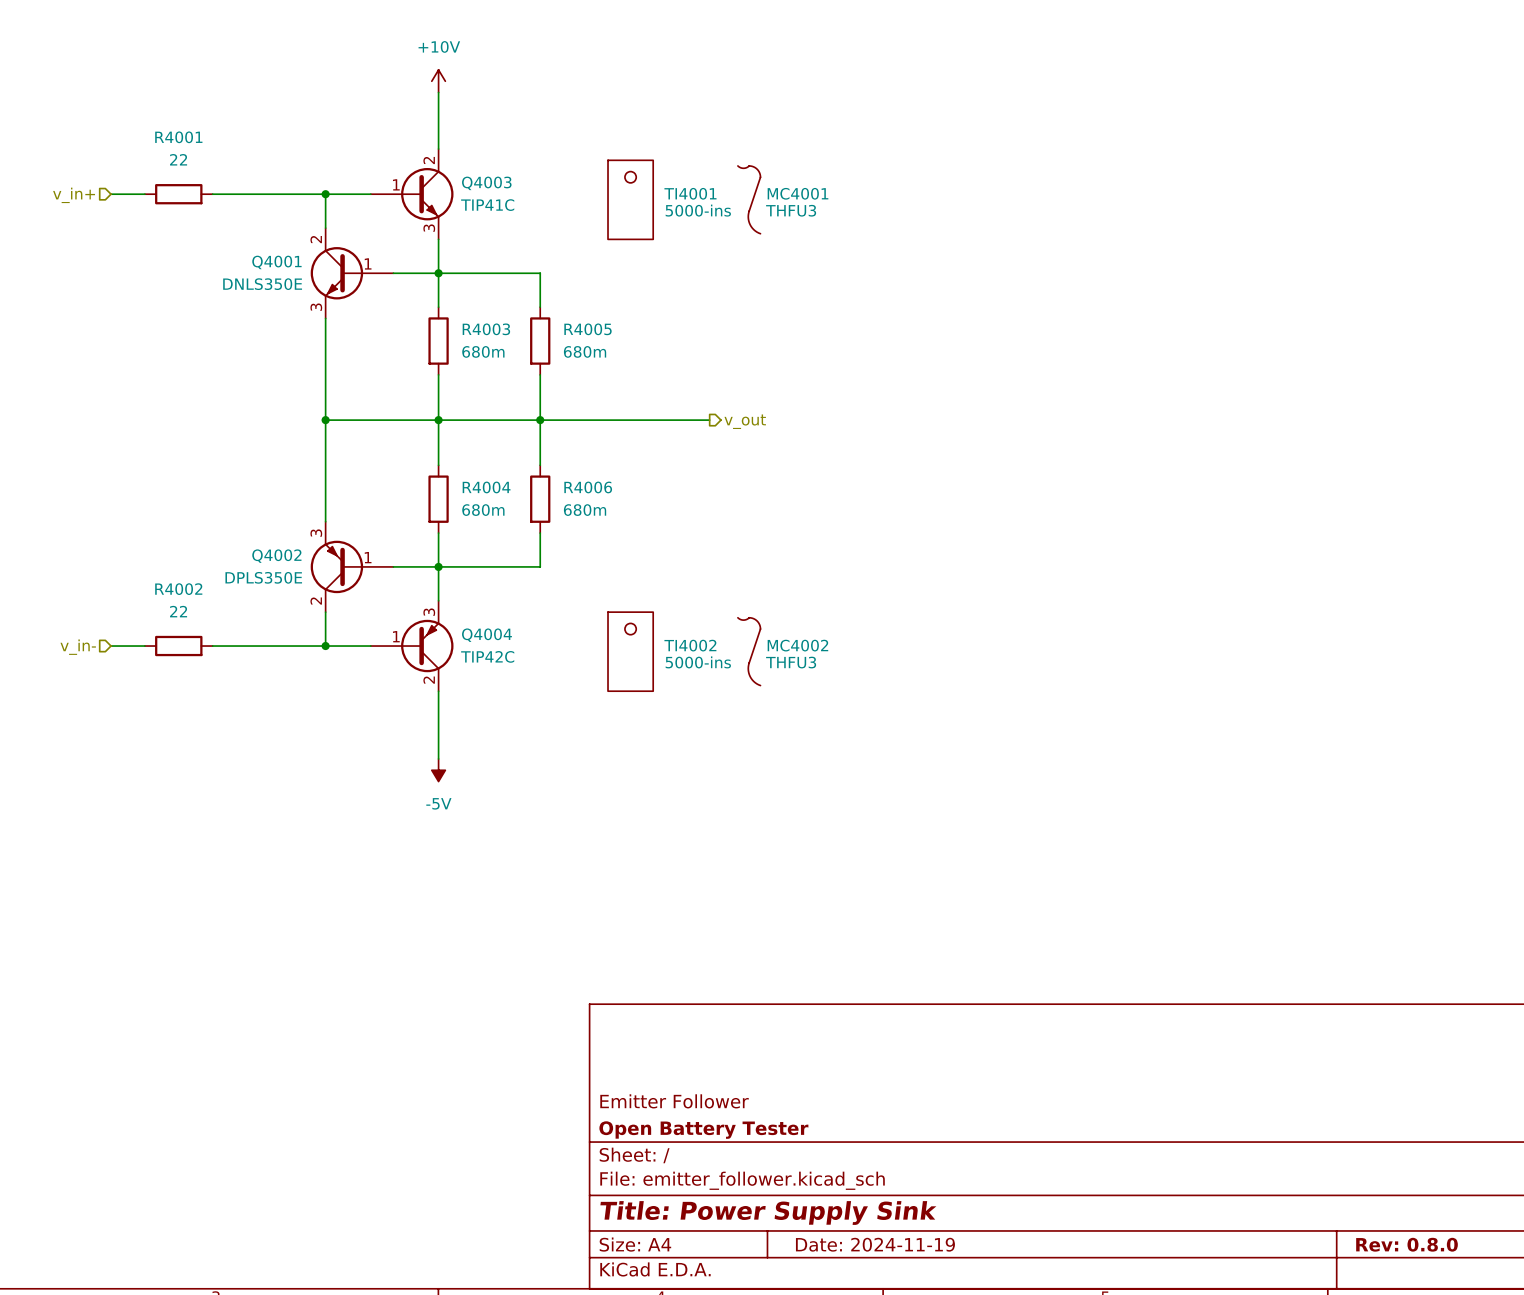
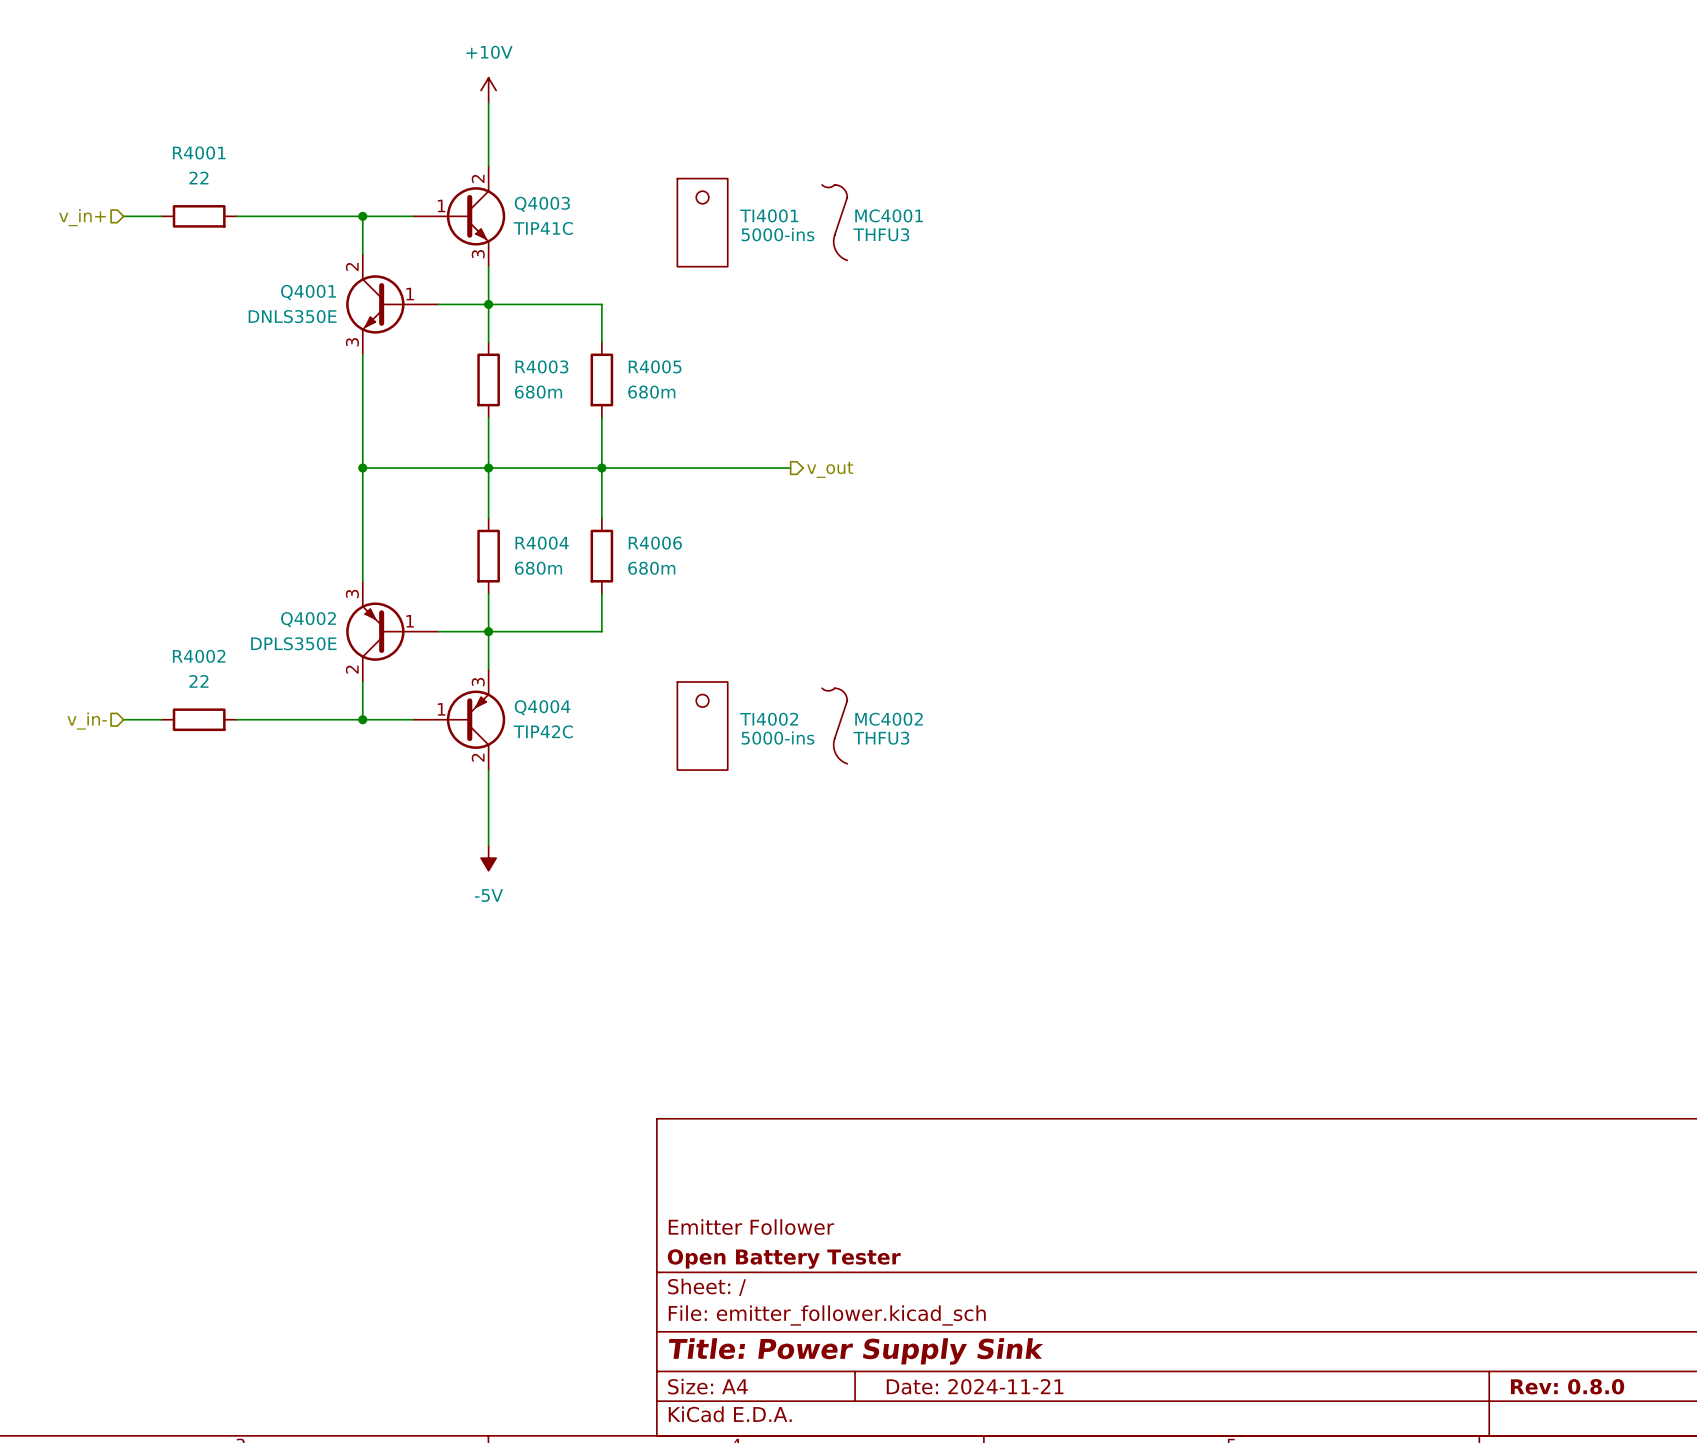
title block: Date: 2024-11-19 (875, 1244) -> Date: 2024-11-21 (975, 1386)

